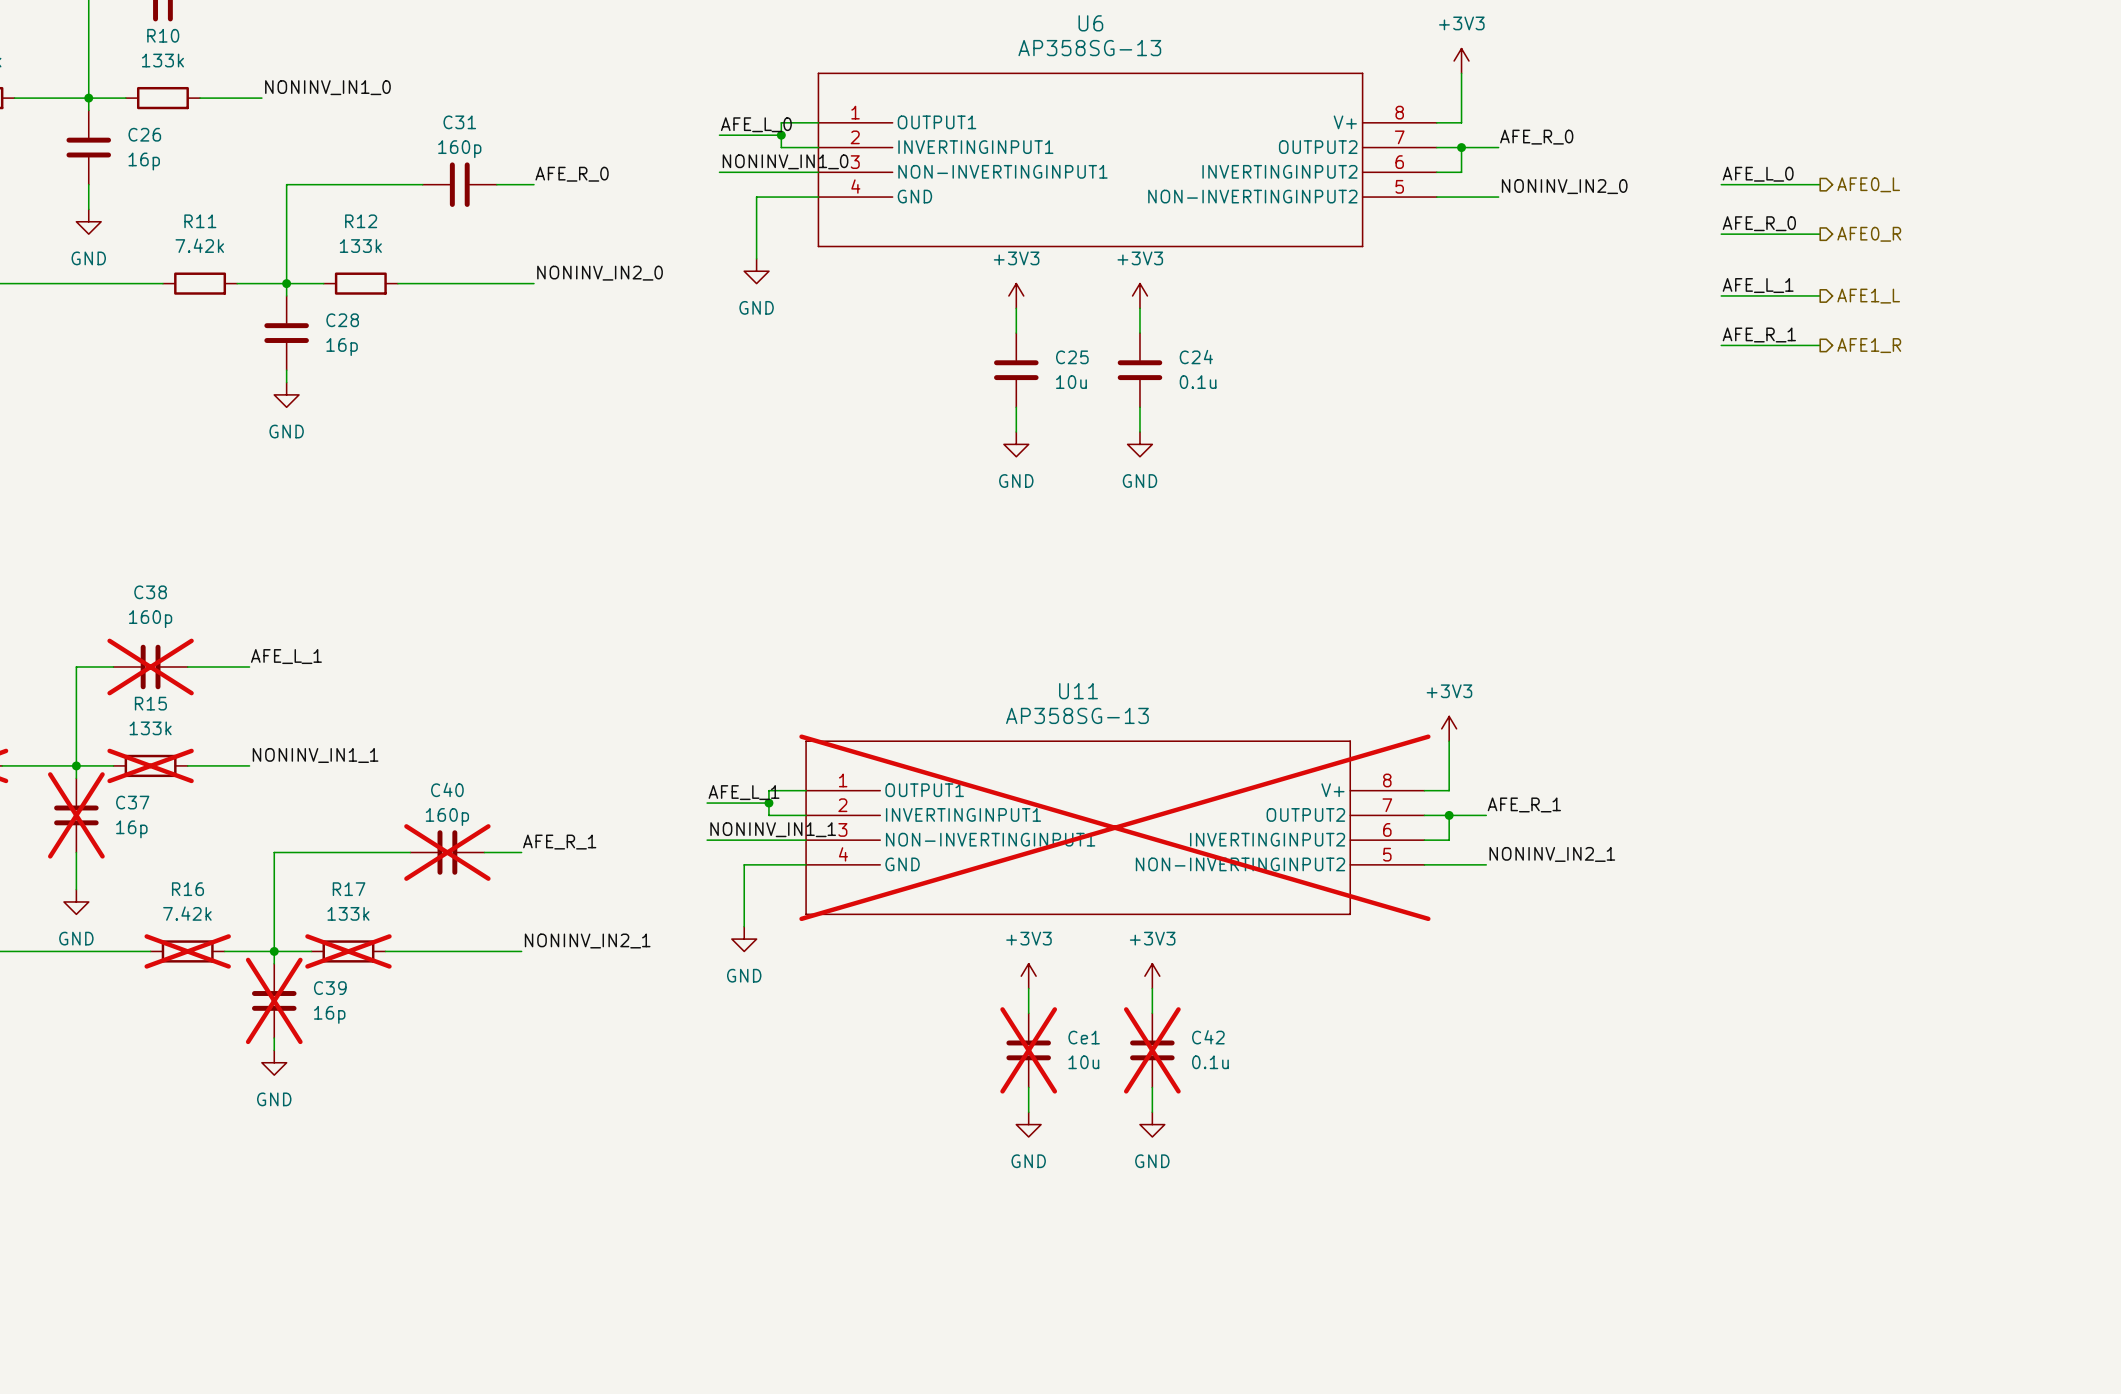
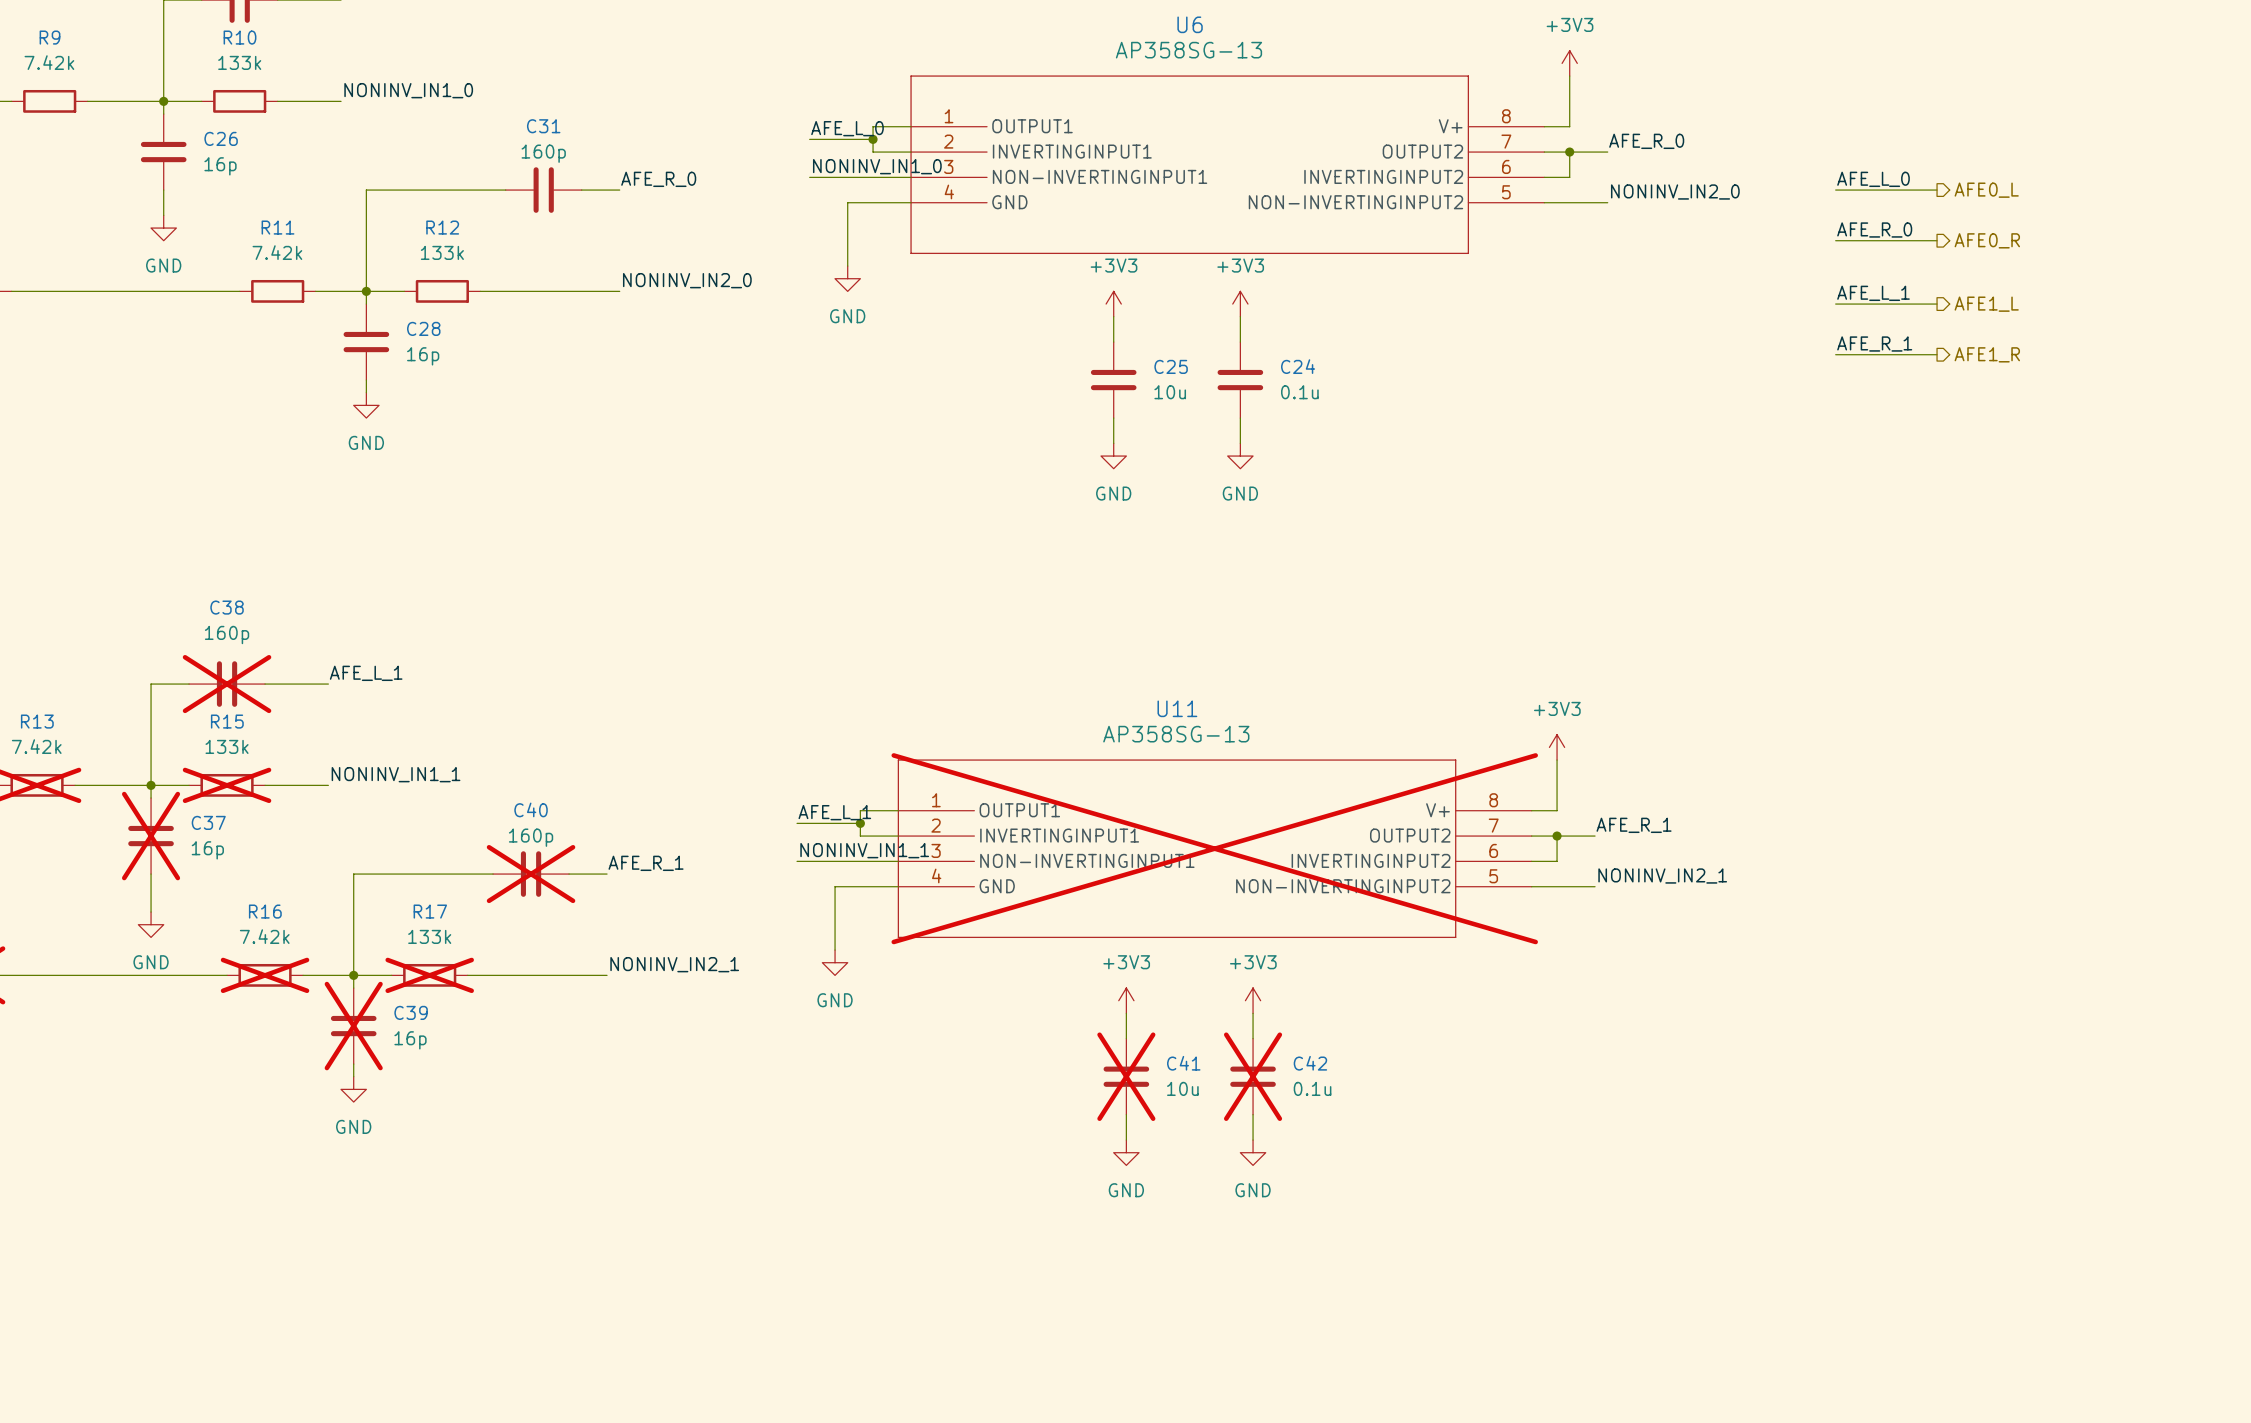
Ce1 name: Ce1 (1084, 1037) -> C41 (1183, 1063)

